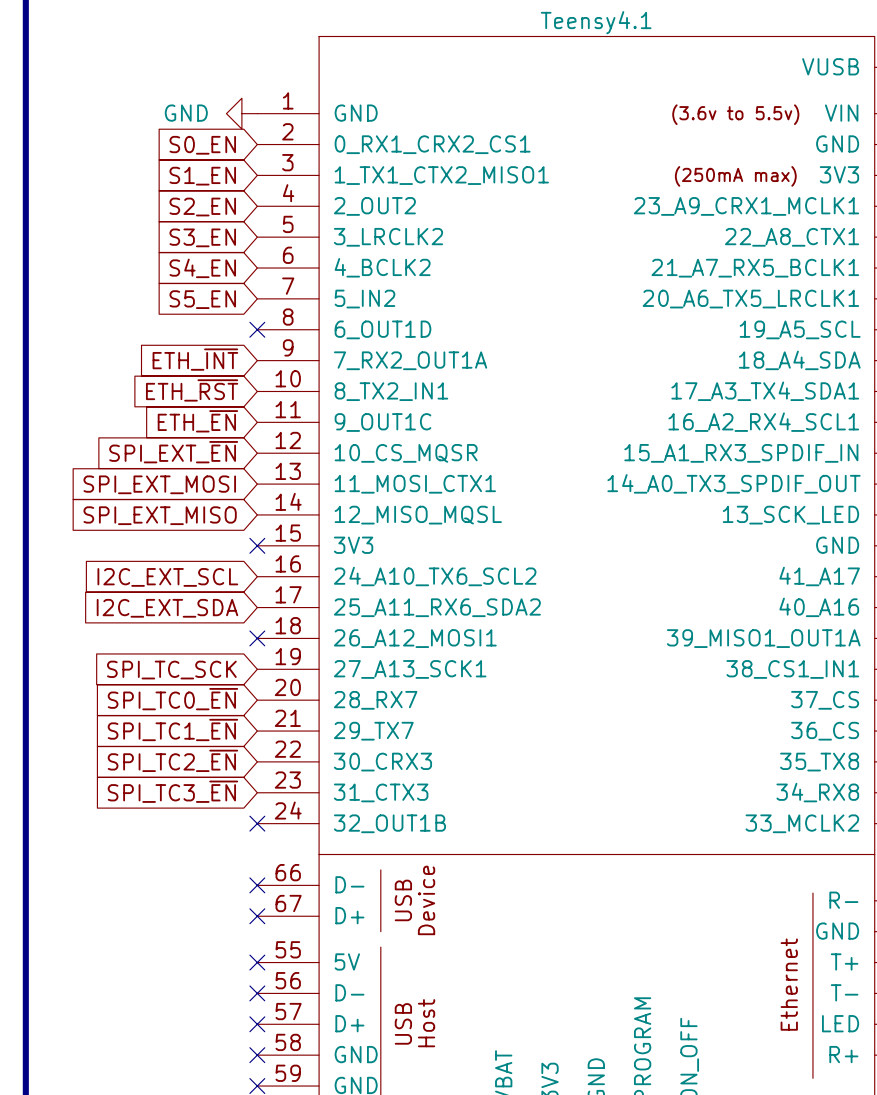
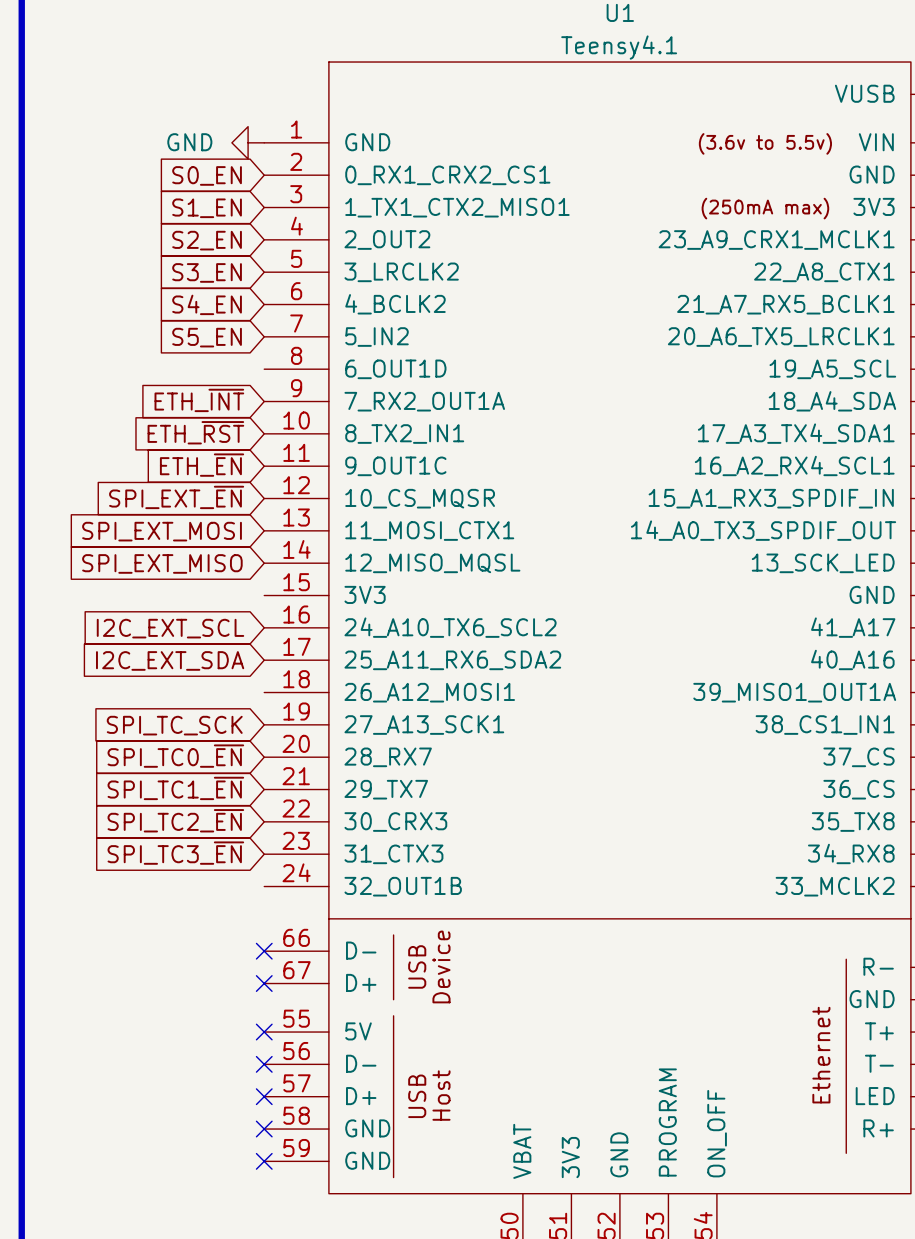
no-connect mark: (257, 329) -> none
no-connect mark: (257, 545) -> none
no-connect mark: (257, 638) -> none
no-connect mark: (257, 823) -> none

